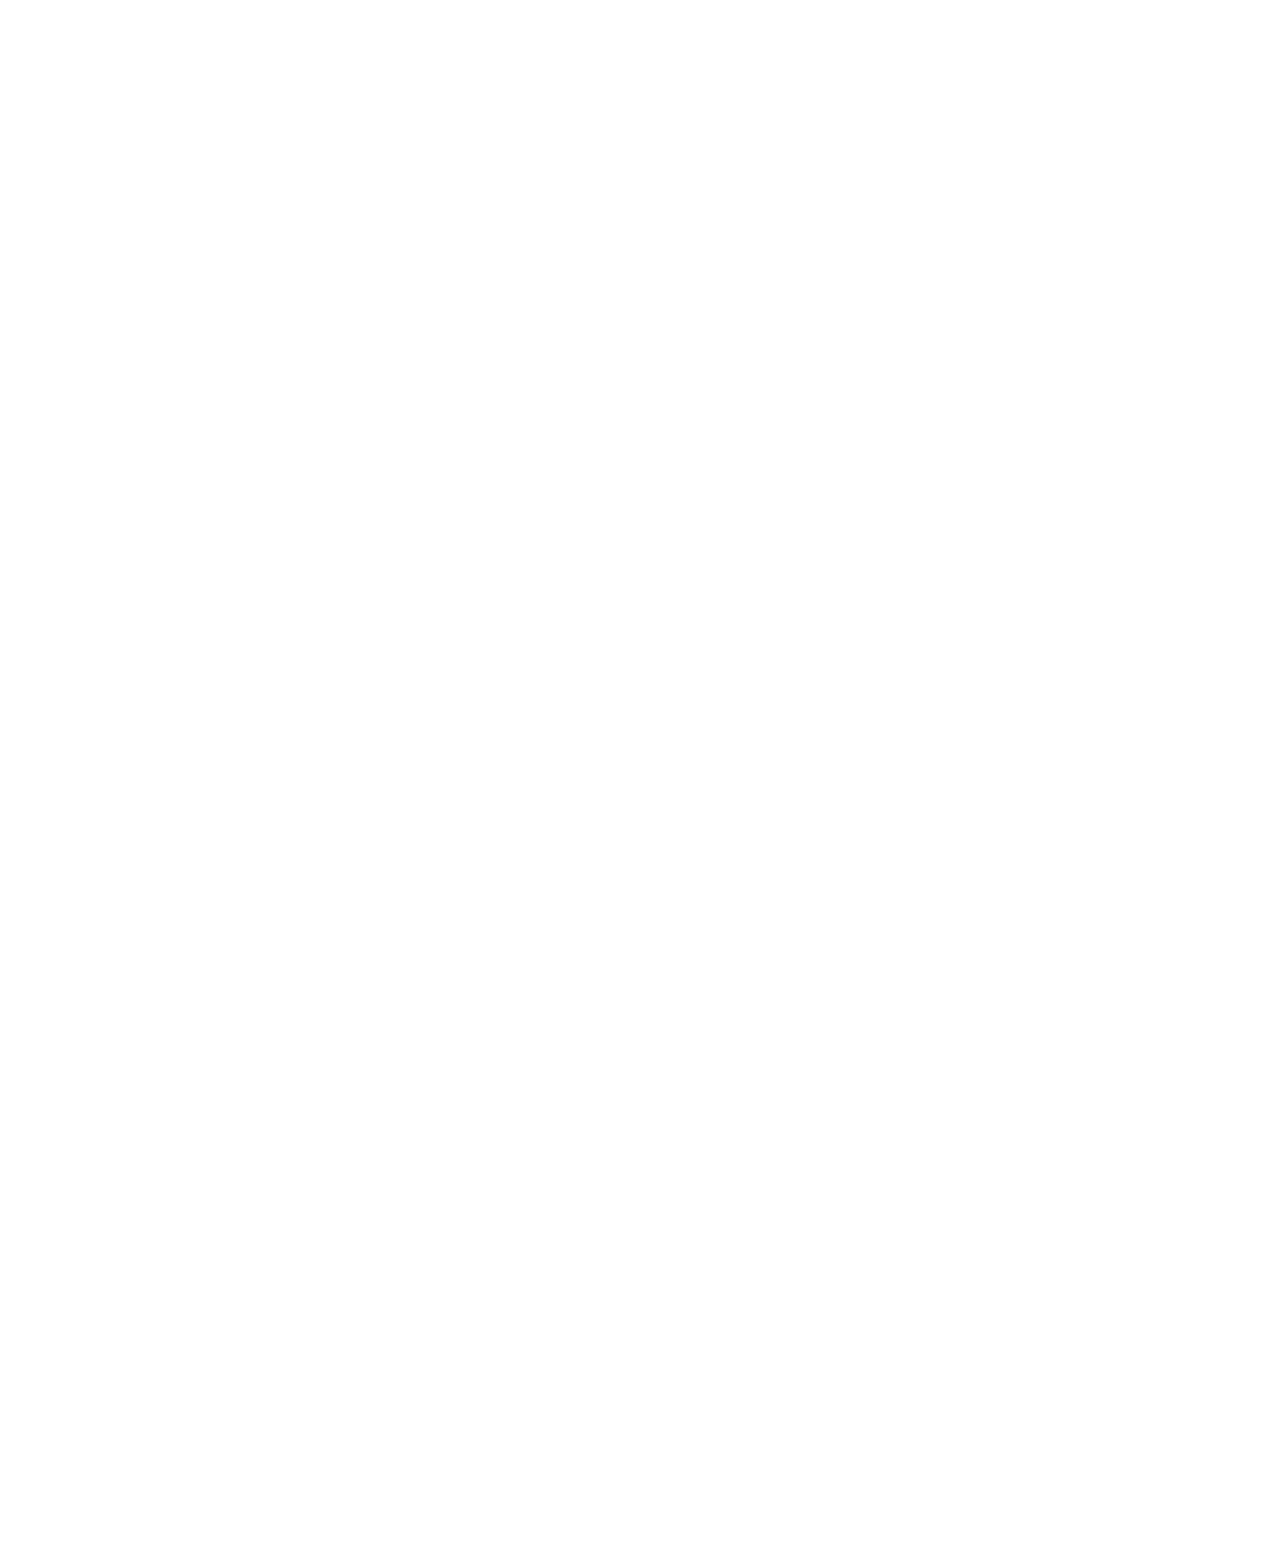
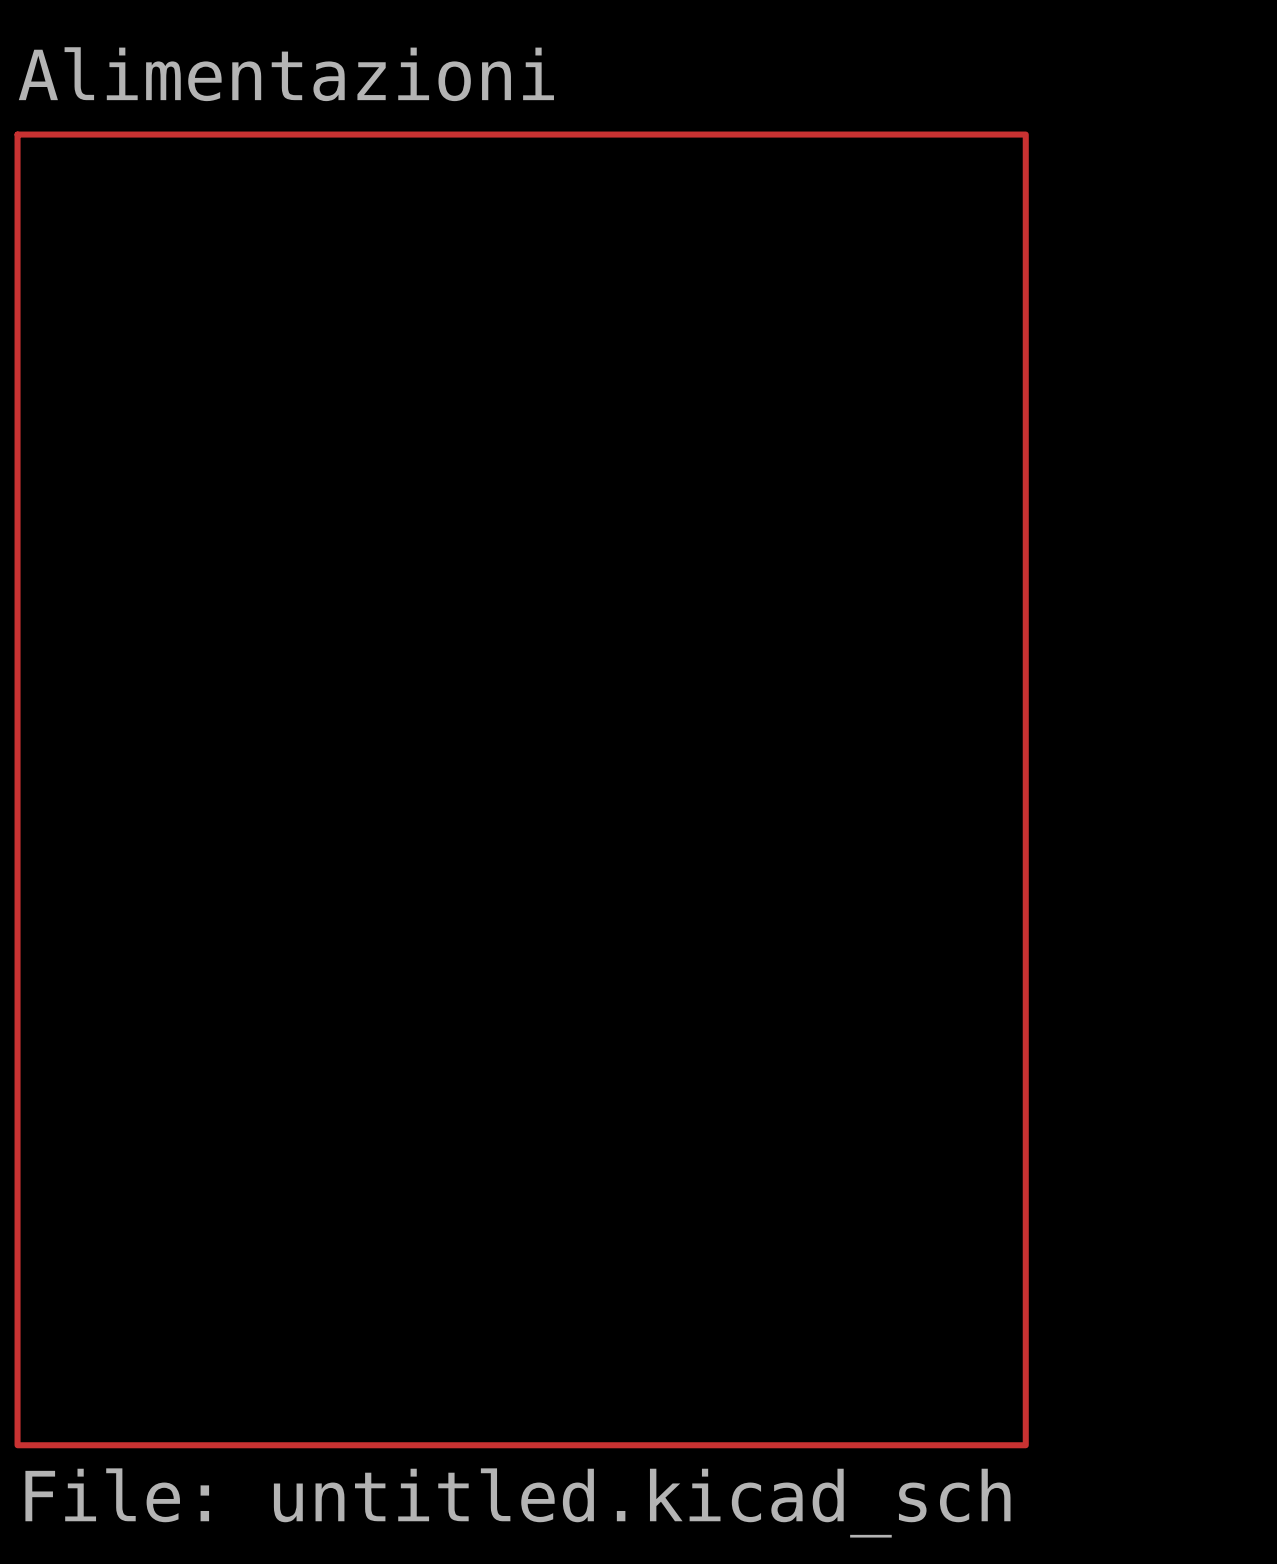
sheet Alimentazioni: none -> File: untitled.kicad_sch (521, 789)

